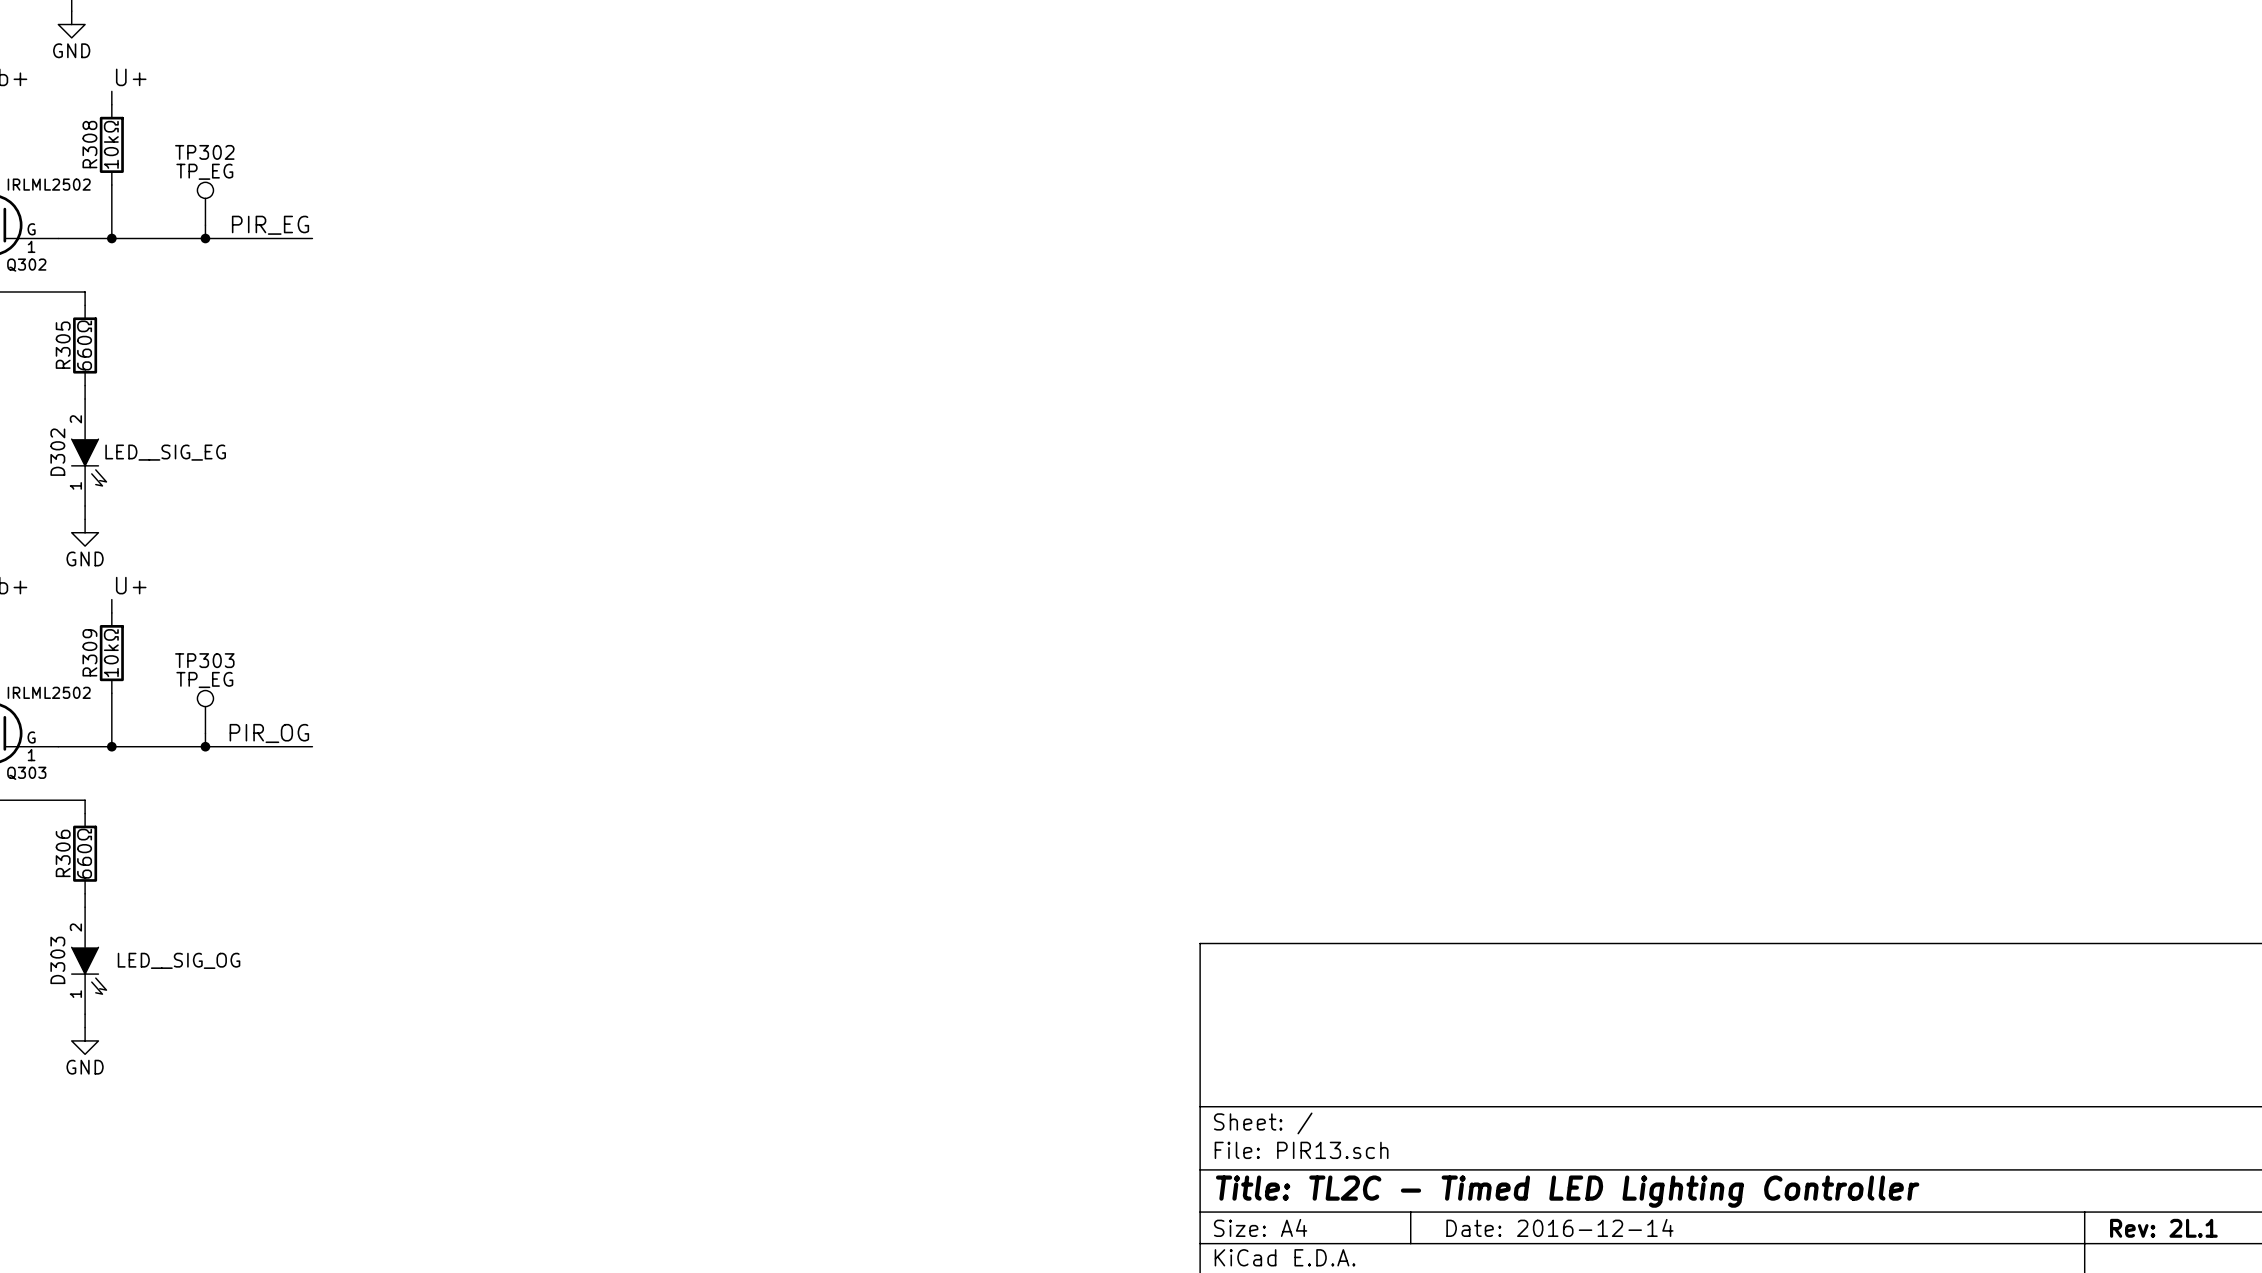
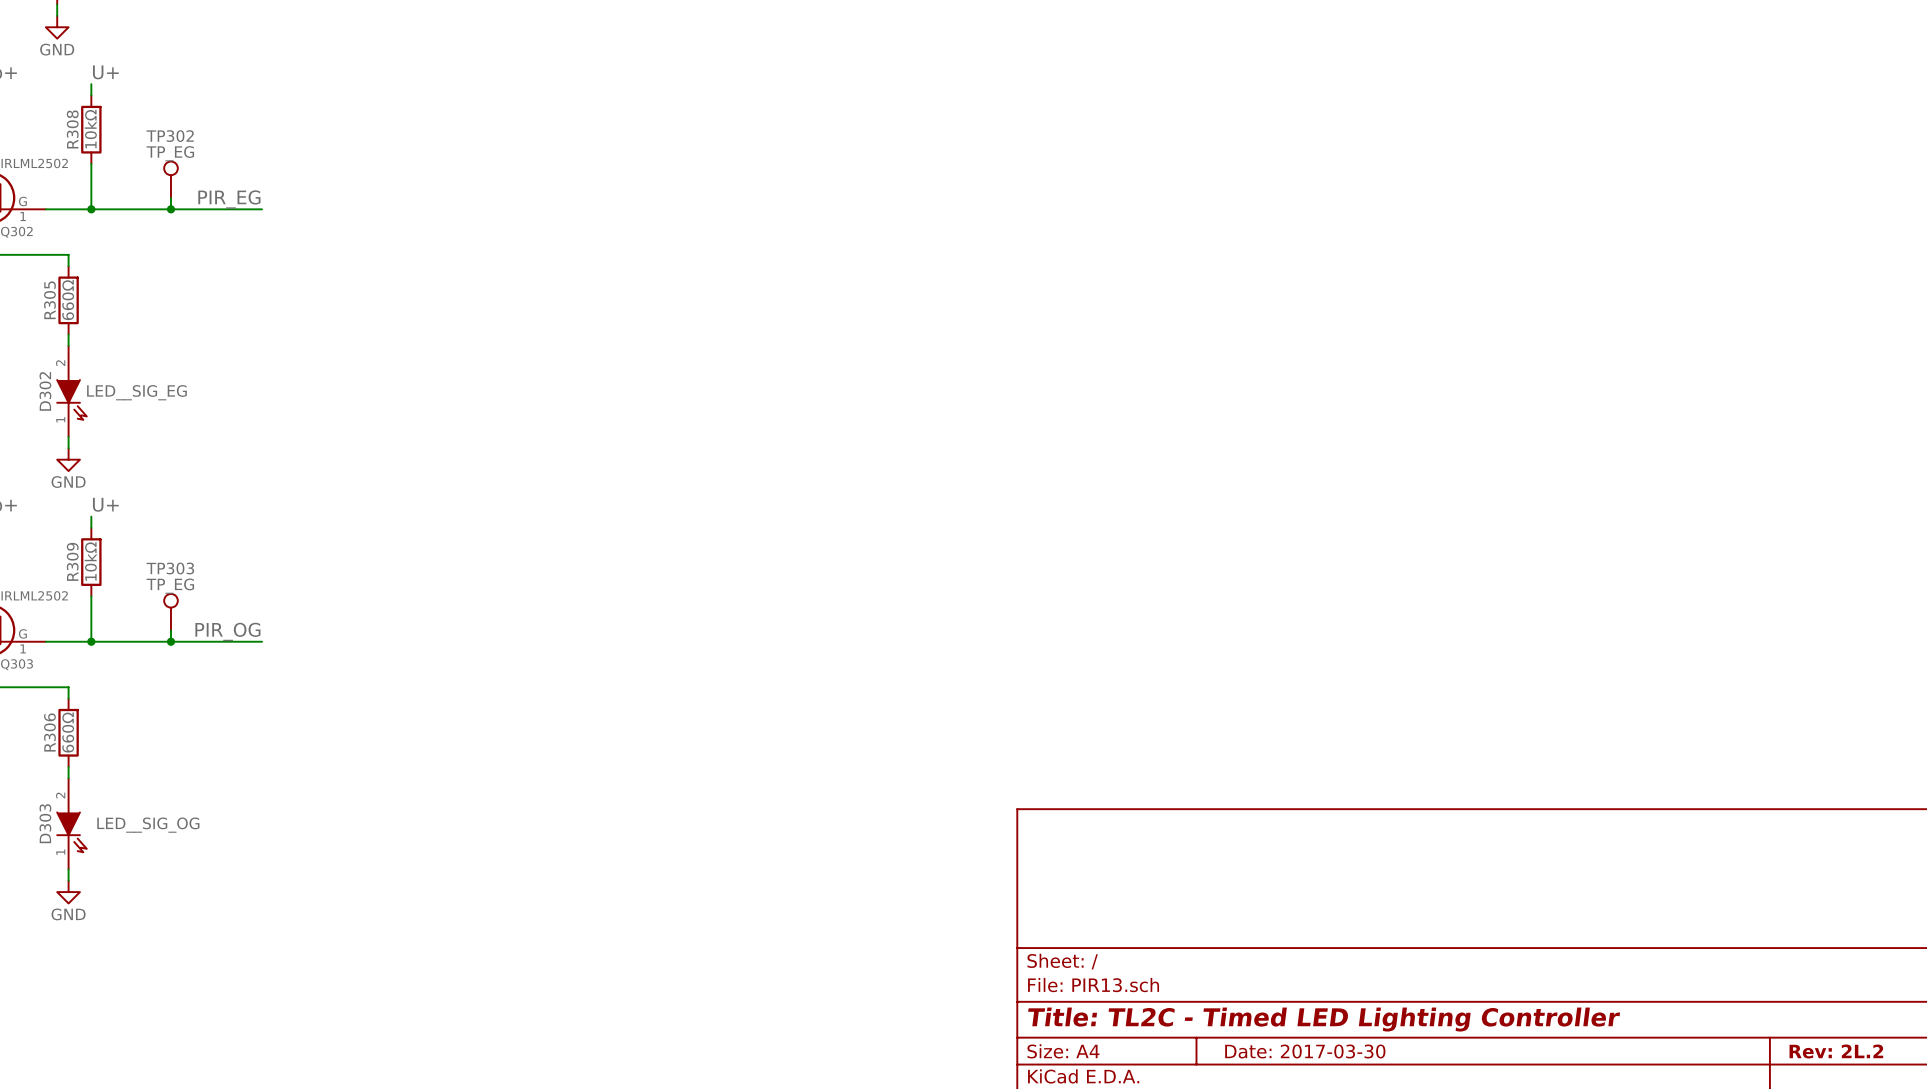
title block: Date: 2016-12-14 (1559, 1227) -> Date: 2017-03-30 (1305, 1051)
title block: Rev: 2L.1 (2163, 1228) -> Rev: 2L.2 (1836, 1051)

